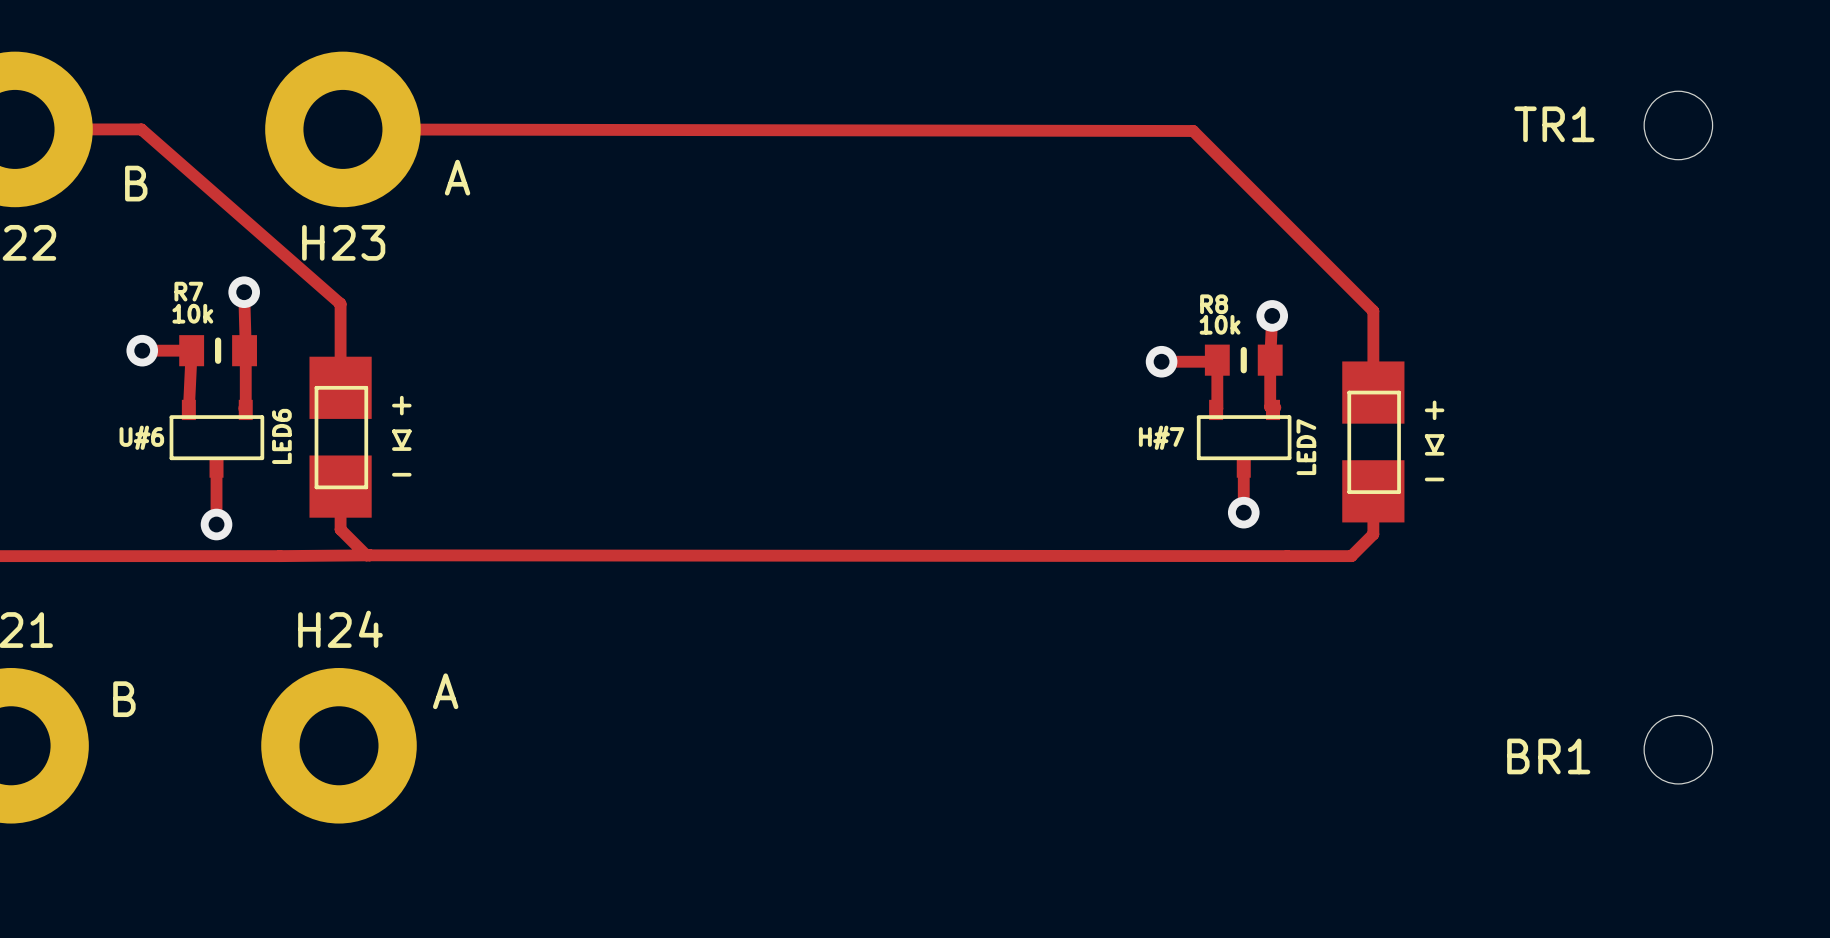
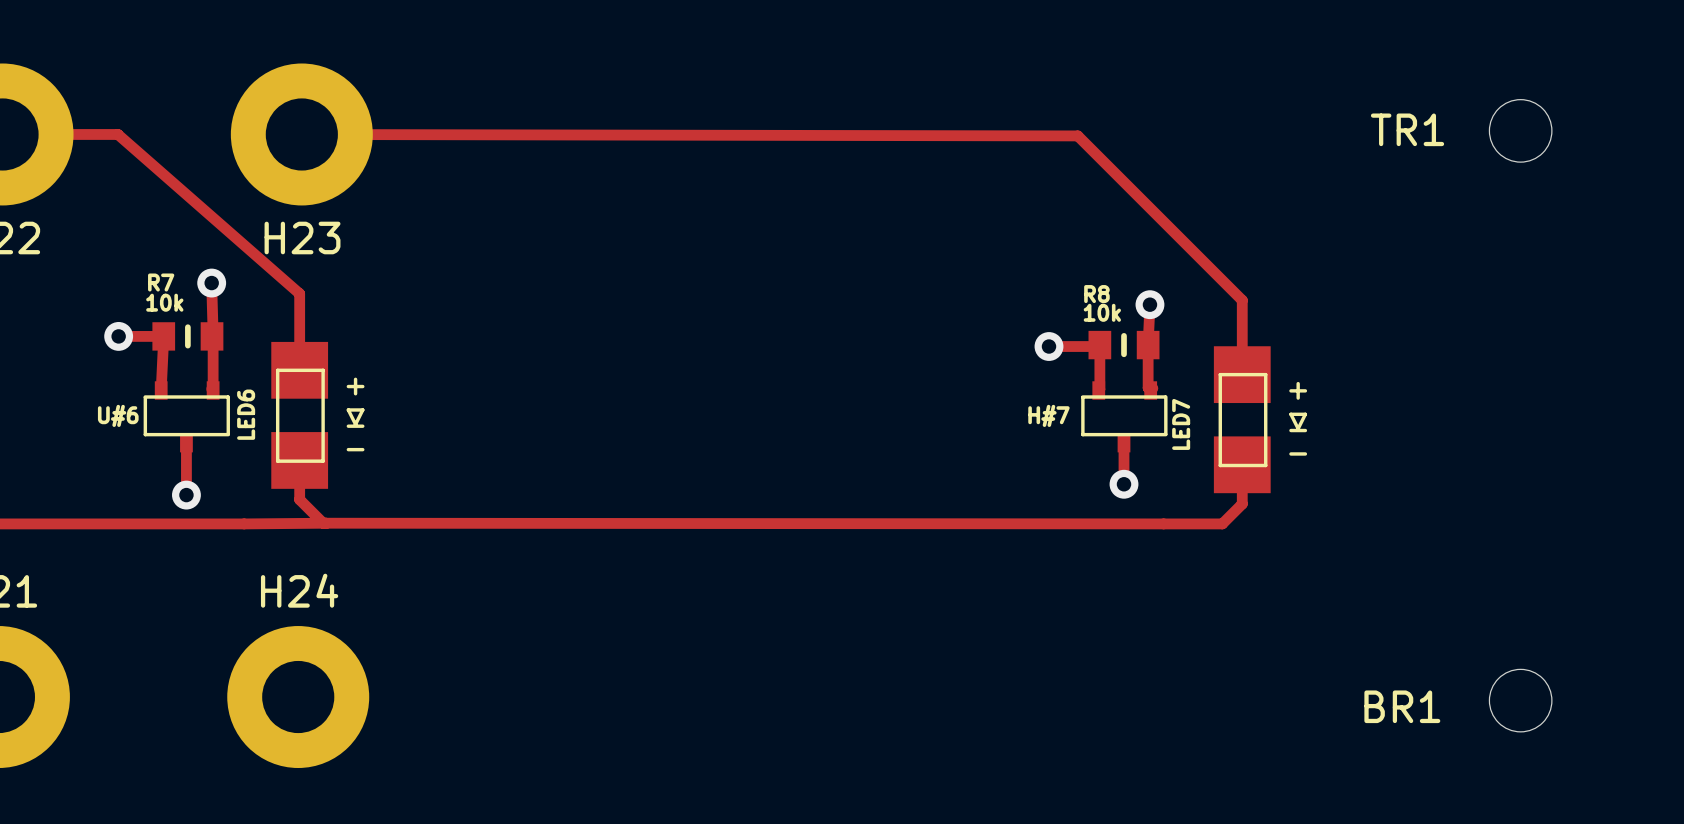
text: A (457, 177) -> none
text: B (136, 183) -> none
text: A (445, 691) -> none
text: B (124, 699) -> none

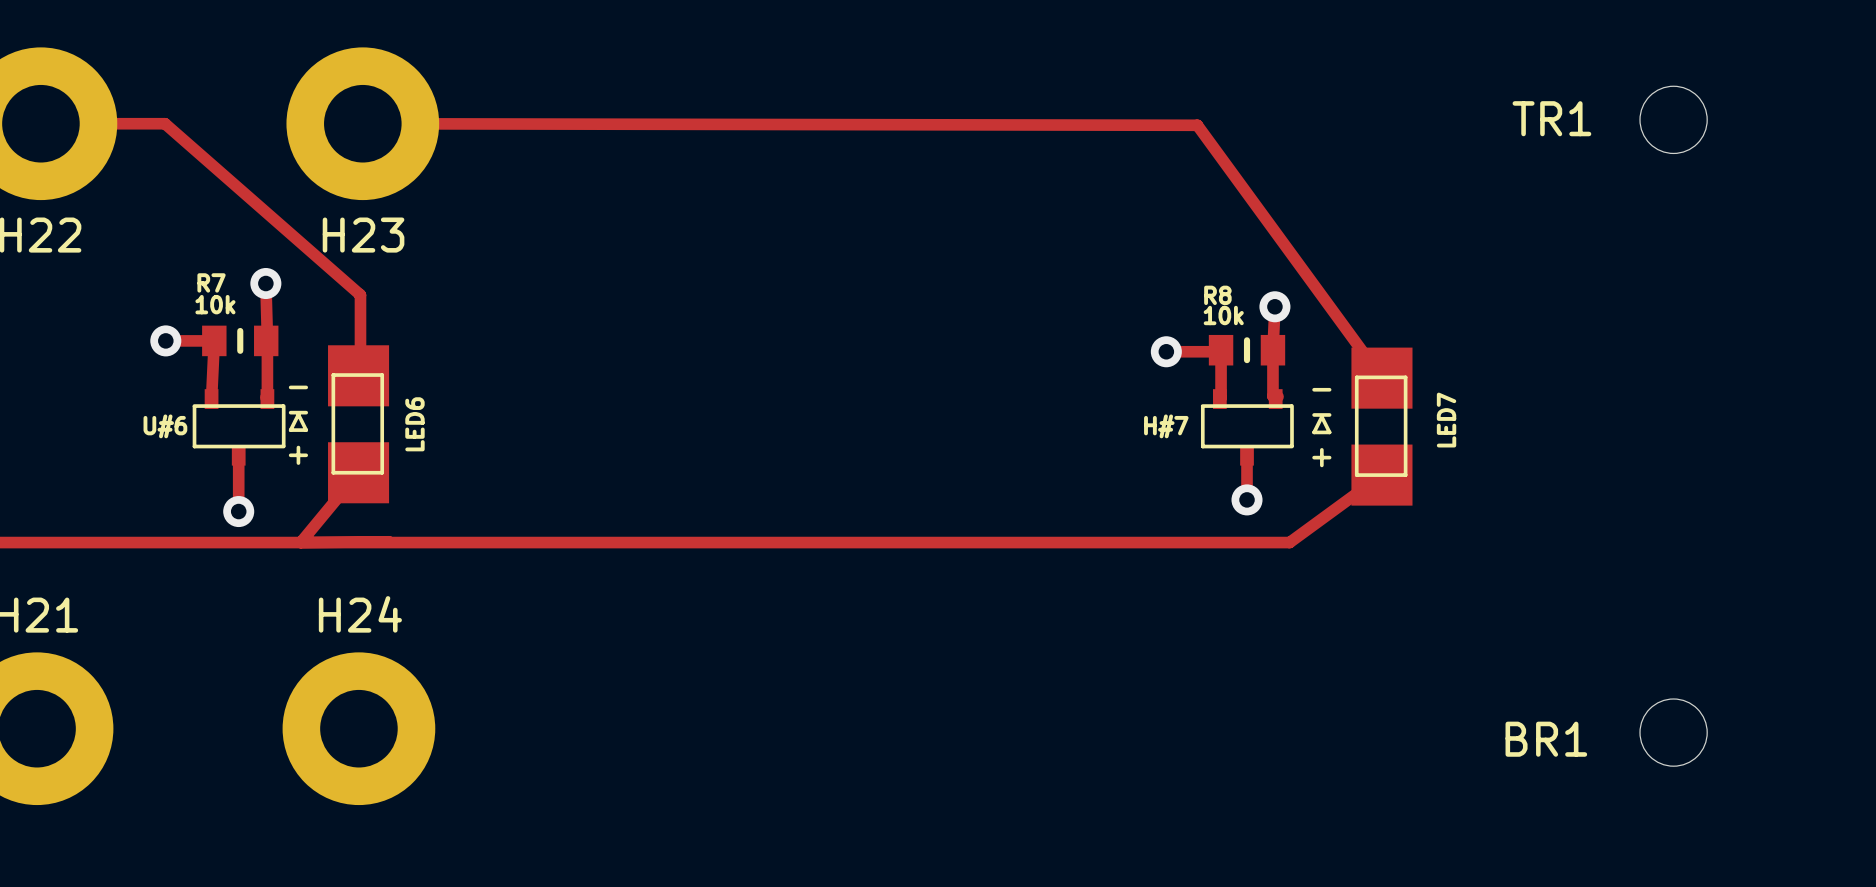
track: (1077, 135) (1242, 300) (1242, 374) -> (1197, 125) (1381, 378)
LED6 rotation: 0° (317, 415) -> 180° (338, 424)
LED7 rotation: 0° (1260, 419) -> 180° (1362, 426)
track: none -> (345, 472) (358, 472) (300, 542) (1289, 542) (1381, 475)
track: (299, 460) (299, 499) (323, 523) (1222, 523) (1242, 504) (1242, 464) -> none

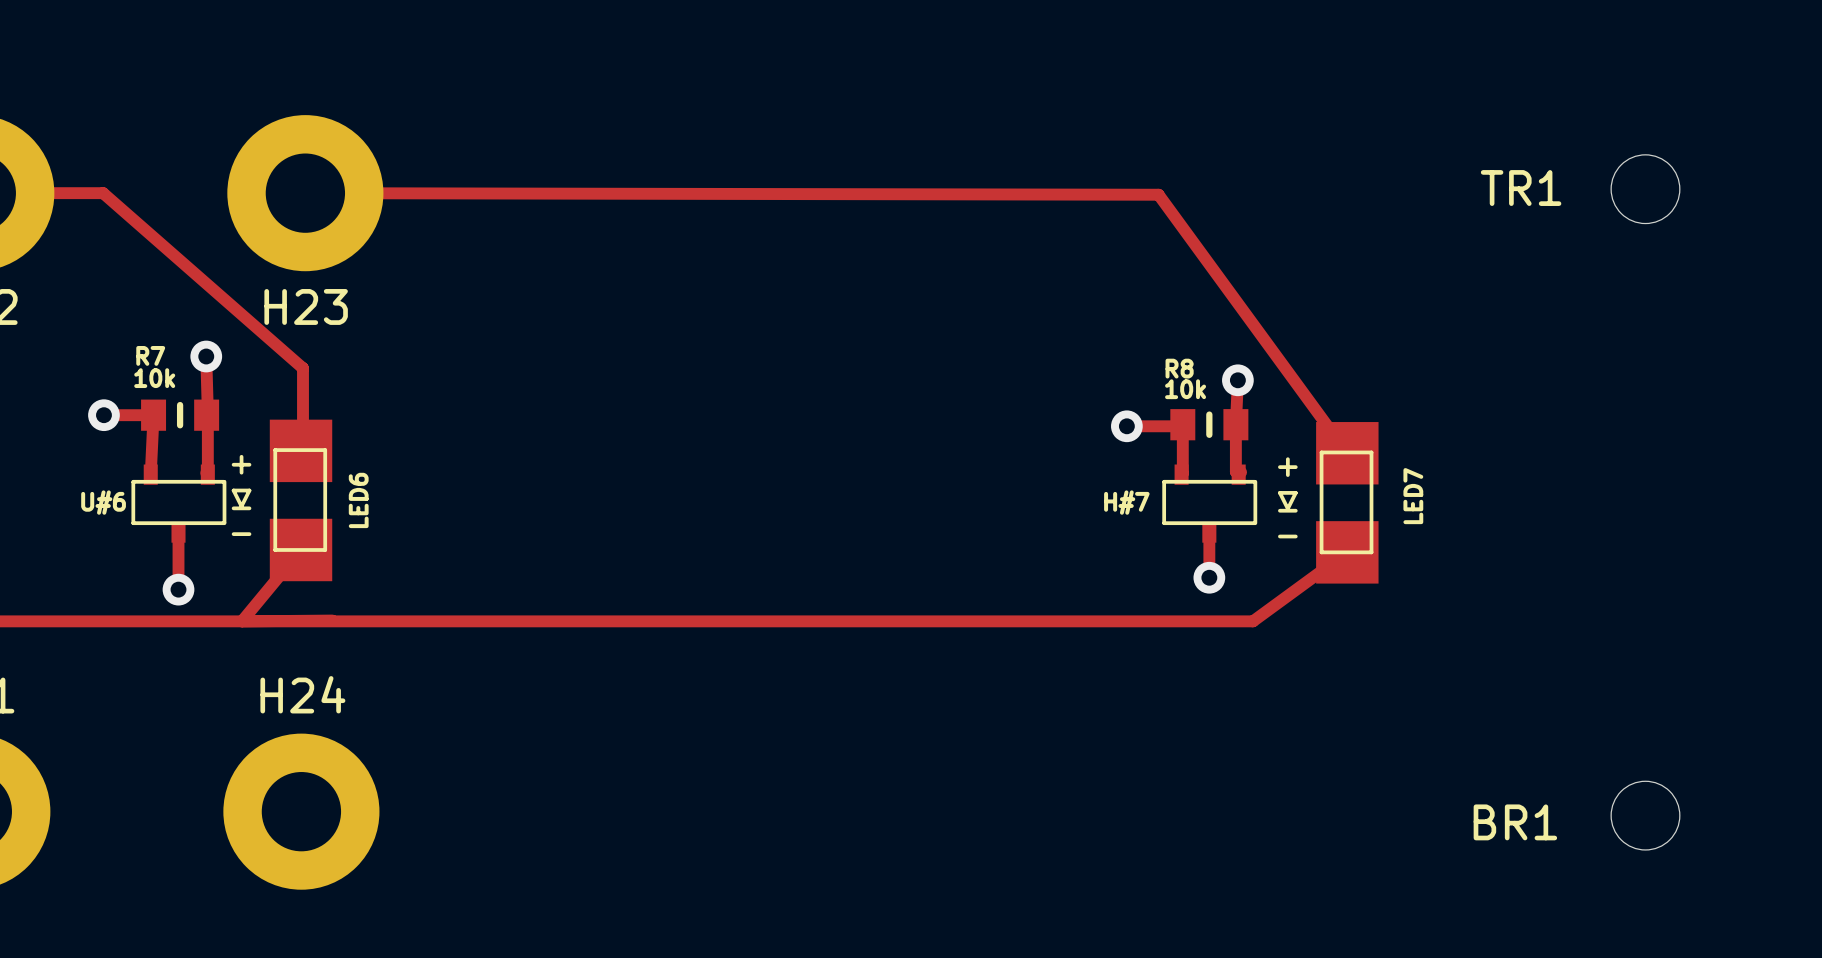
LED6 footprint: [288, 345, 390, 504] -> [231, 419, 333, 582]
LED7 footprint: [1312, 347, 1413, 506] -> [1278, 422, 1379, 584]

